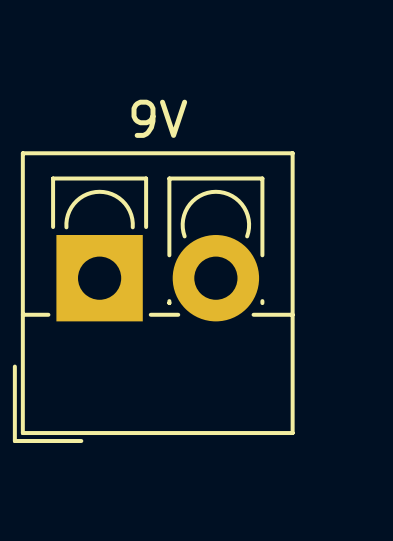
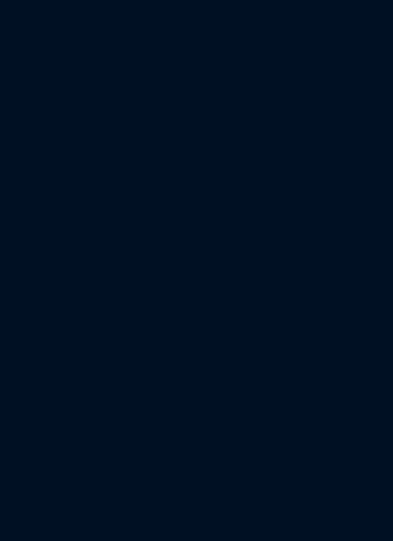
9V: (153, 297) -> none

